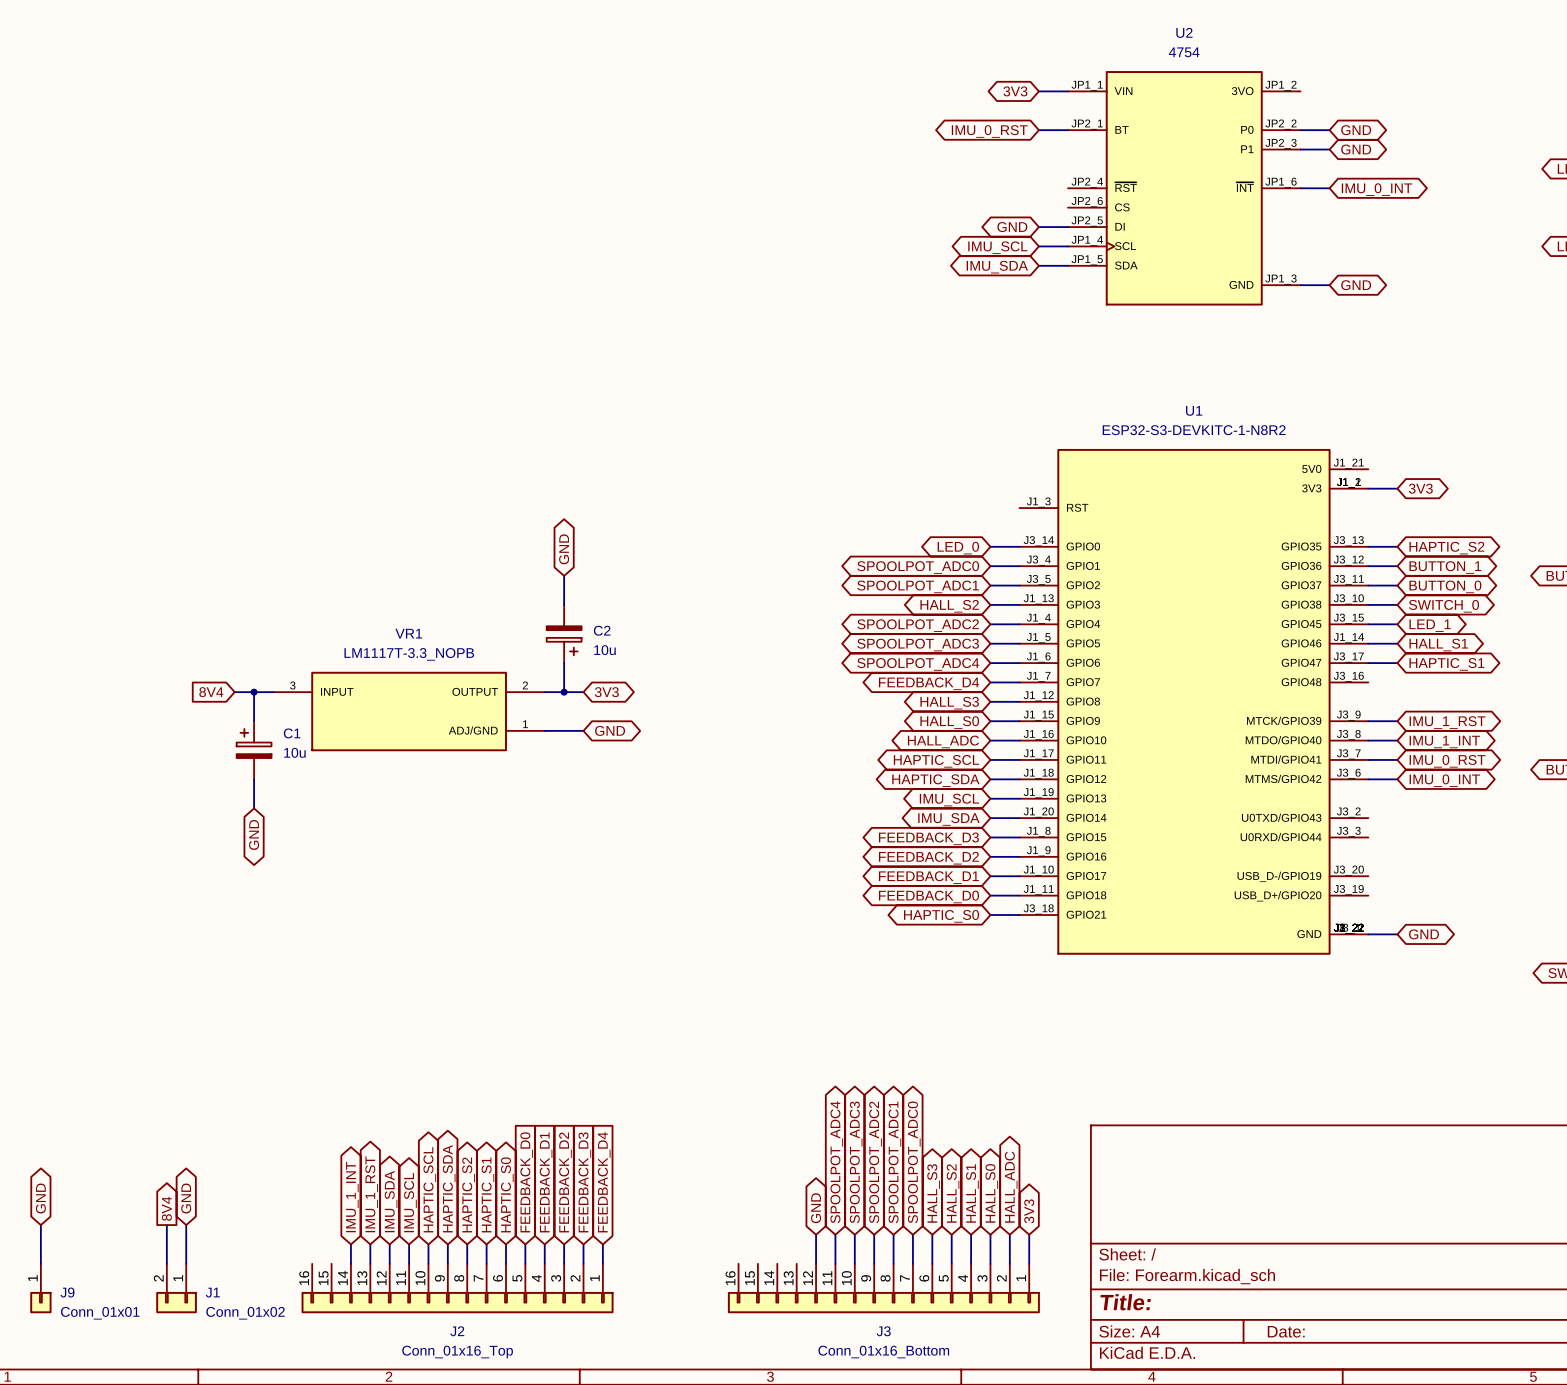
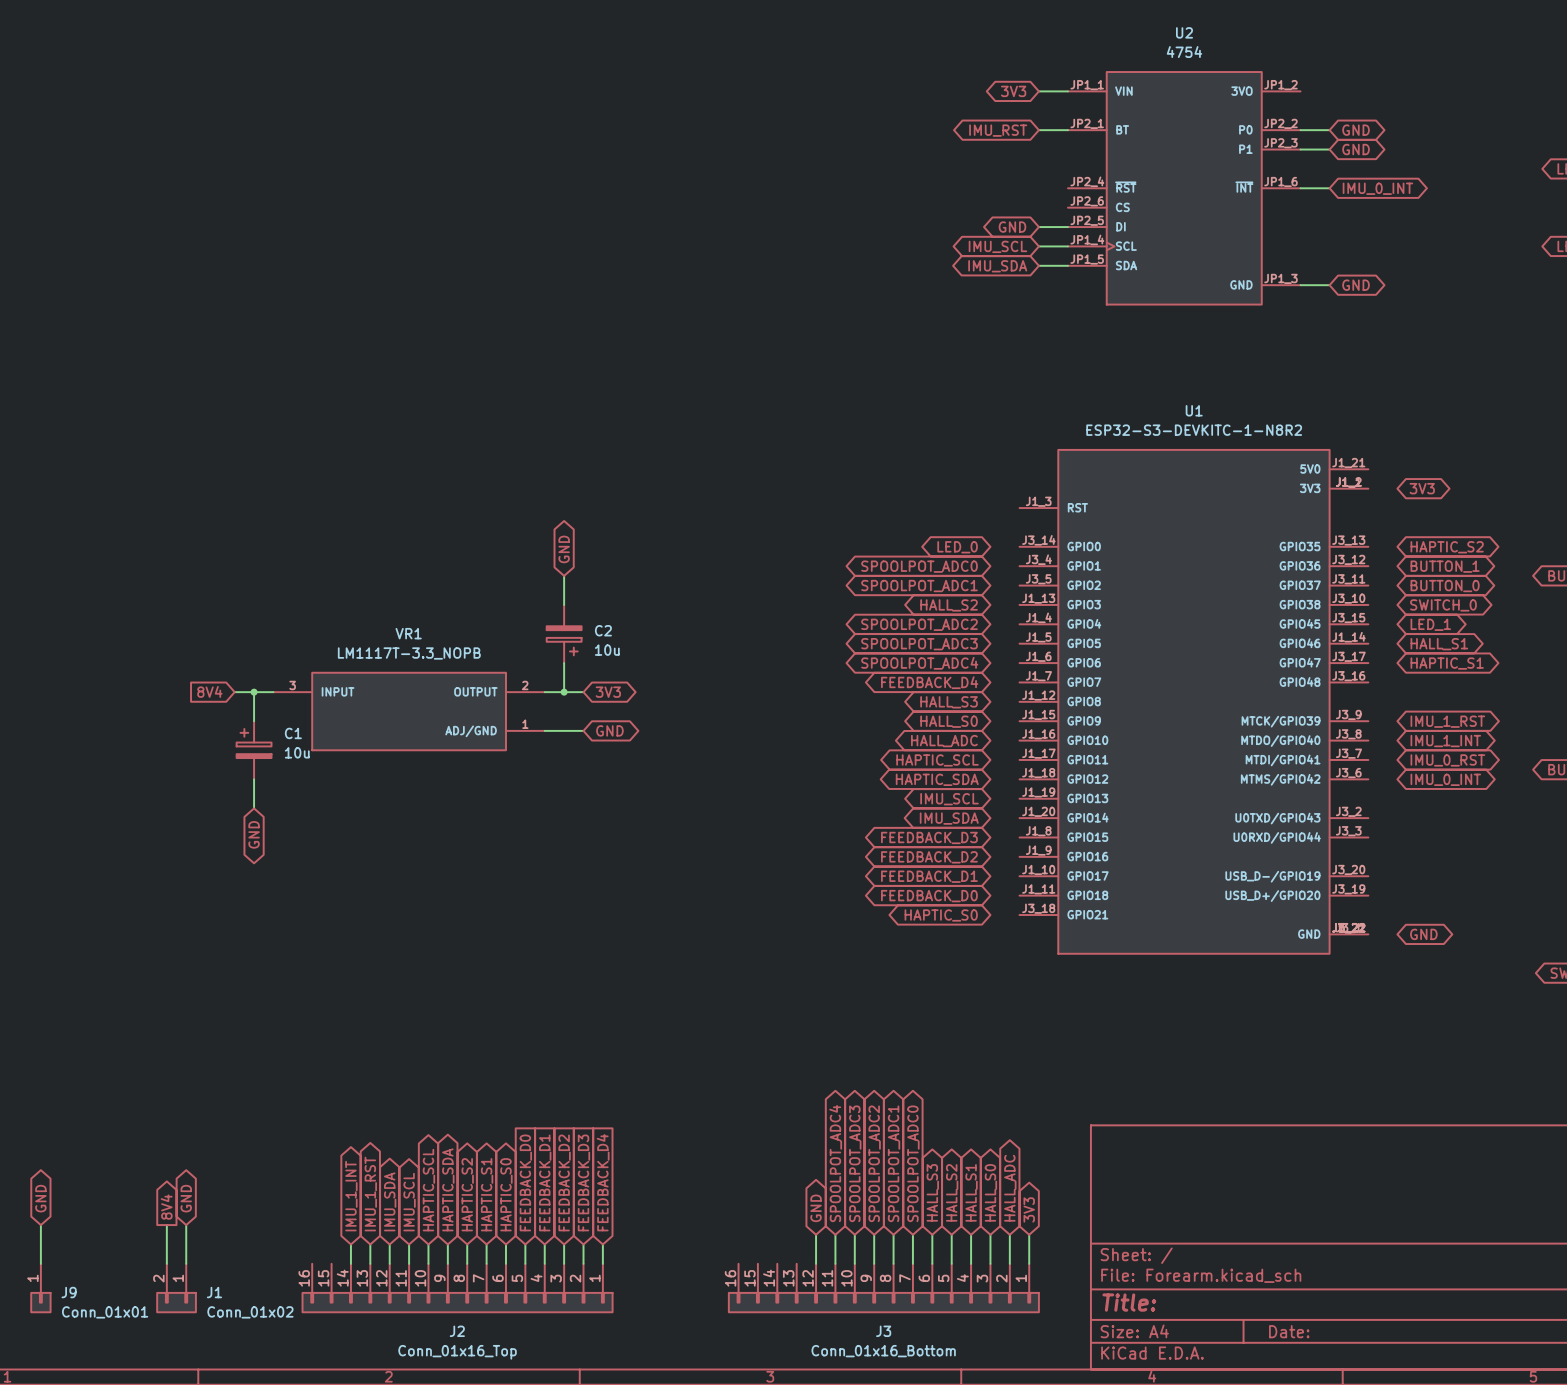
global label: IMU_0_RST (989, 131) -> IMU_RST (998, 130)
wire: (1368, 488) (1397, 488) -> none
wire: (990, 546) (1019, 546) -> none
wire: (1368, 546) (1397, 546) -> none
wire: (990, 566) (1019, 566) -> none
wire: (1368, 566) (1397, 566) -> none
wire: (990, 585) (1019, 585) -> none
wire: (1368, 585) (1397, 585) -> none
wire: (990, 604) (1019, 604) -> none
wire: (1368, 604) (1397, 604) -> none
wire: (990, 624) (1019, 624) -> none
wire: (1368, 624) (1397, 624) -> none
wire: (990, 643) (1019, 643) -> none
wire: (1368, 643) (1397, 643) -> none
wire: (990, 663) (1019, 663) -> none
wire: (1368, 663) (1397, 663) -> none
wire: (990, 682) (1019, 682) -> none
wire: (990, 701) (1019, 701) -> none
wire: (990, 721) (1019, 721) -> none
wire: (1368, 721) (1397, 721) -> none
wire: (990, 740) (1019, 740) -> none
wire: (1368, 740) (1397, 740) -> none
wire: (990, 759) (1019, 759) -> none
wire: (1368, 759) (1397, 759) -> none
wire: (990, 779) (1019, 779) -> none
wire: (1368, 779) (1397, 779) -> none
wire: (990, 798) (1019, 798) -> none
wire: (990, 818) (1019, 818) -> none
wire: (990, 837) (1019, 837) -> none
wire: (990, 856) (1019, 856) -> none
wire: (990, 876) (1019, 876) -> none
wire: (990, 895) (1019, 895) -> none
wire: (990, 915) (1019, 915) -> none
wire: (1368, 934) (1397, 934) -> none

